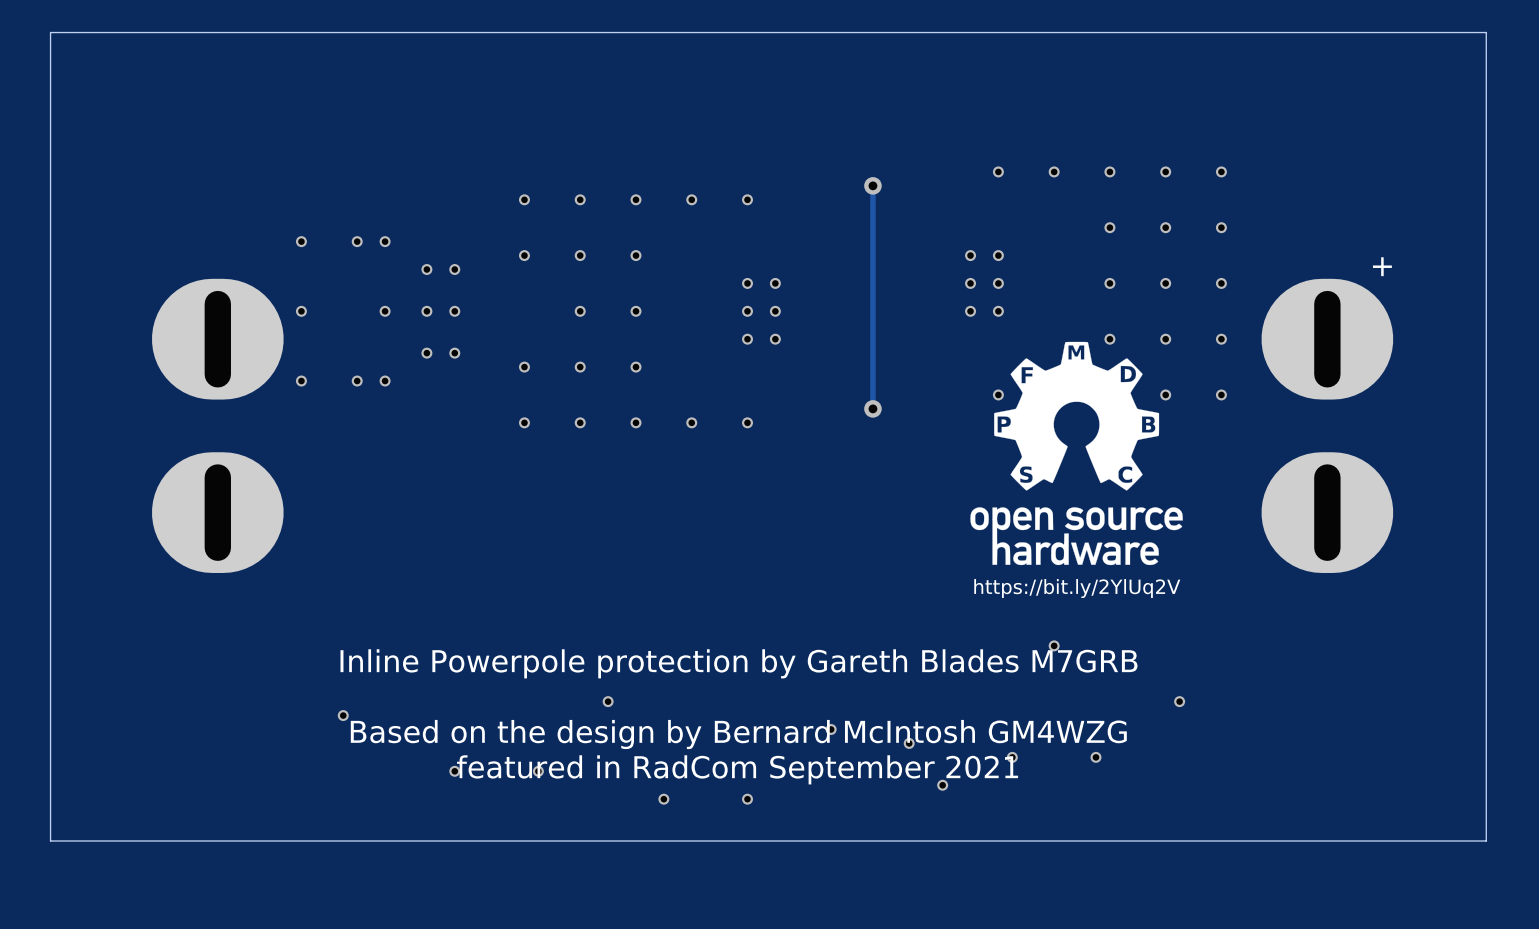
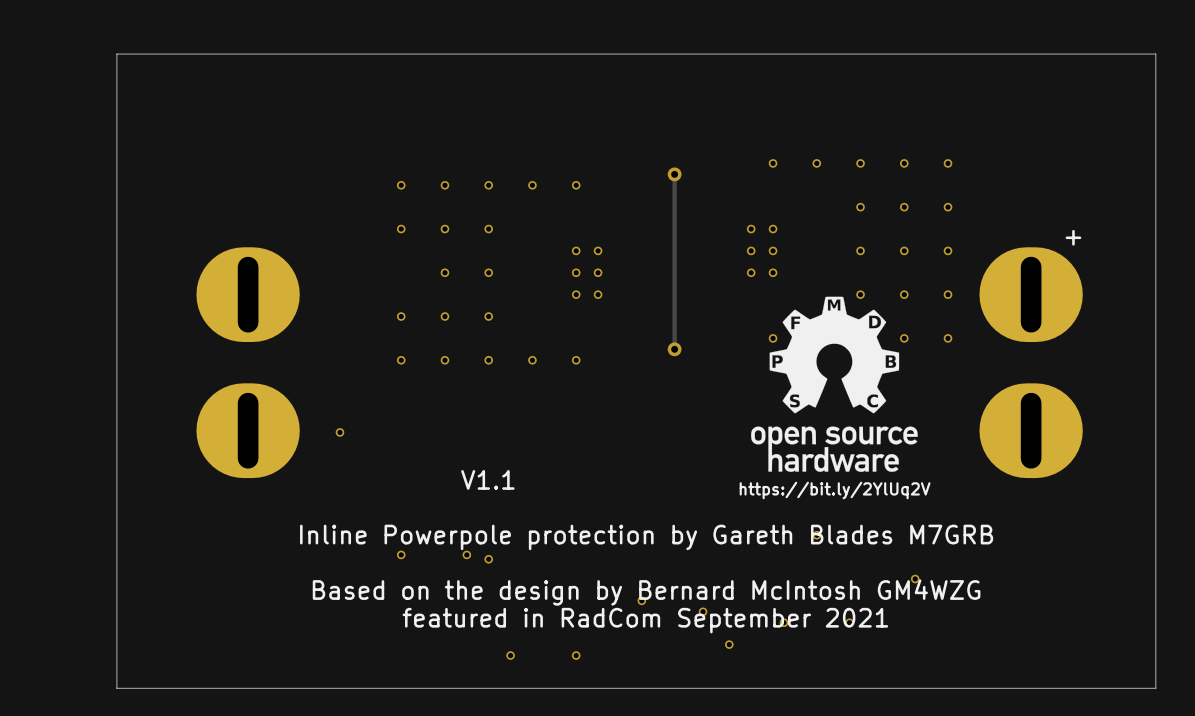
board edge: (162, 32) (50, 32) (50, 841) (162, 841) -> (116, 54) (116, 688)
via: (301, 241) -> none
via: (357, 241) -> none
via: (385, 241) -> none
via: (426, 269) -> none
via: (454, 269) -> none
via: (301, 311) -> none
via: (385, 311) -> none
via: (426, 311) -> none
via: (454, 311) -> none
via: (426, 353) -> none
via: (454, 353) -> none
via: (301, 381) -> none
via: (357, 381) -> none
via: (385, 381) -> none
part position: (217, 425) -> (248, 362)
via: none -> (339, 432)
text: none -> V1.1 (487, 479)
text position: Inline Powerpole protection by Gareth Blades M7GRB (738, 663) -> Inline Powerpole protection by Gareth Blades M7GRB (646, 537)
via: none -> (401, 554)
via: none -> (466, 554)
via: none -> (488, 559)
via: (608, 701) -> none
via: (343, 715) -> none
text position: Based on the design by Bernard McIntosh GM4WZG (738, 734) -> Based on the design by Bernard McIntosh GM4WZG (646, 592)
text position: featured in RadCom September 2021 (737, 769) -> featured in RadCom September 2021 (645, 620)
via: (454, 771) -> none
via: (538, 771) -> none

